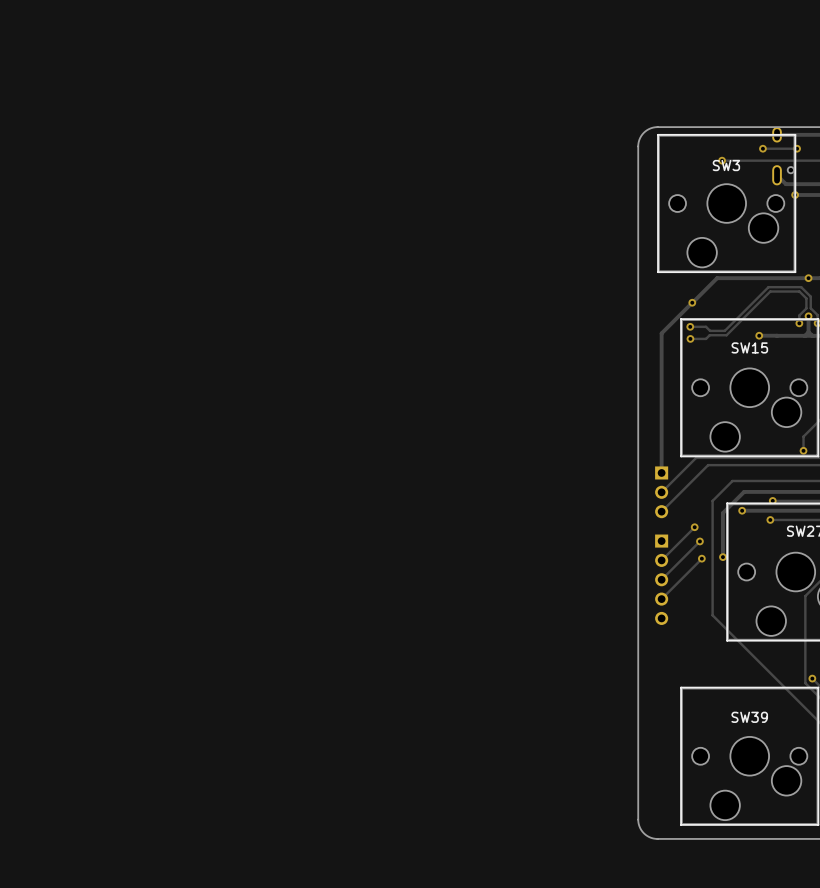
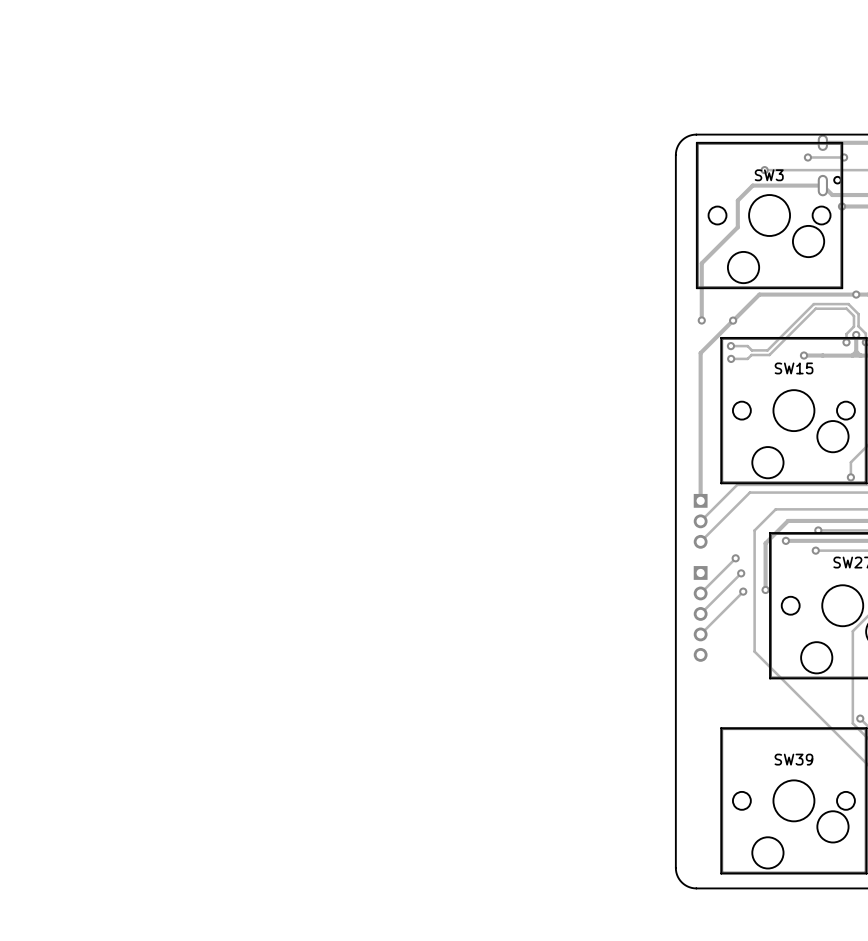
track: none -> (822, 185) (752, 185) (737, 200) (737, 227) (701, 263) (701, 320)
via: none -> (701, 320)

